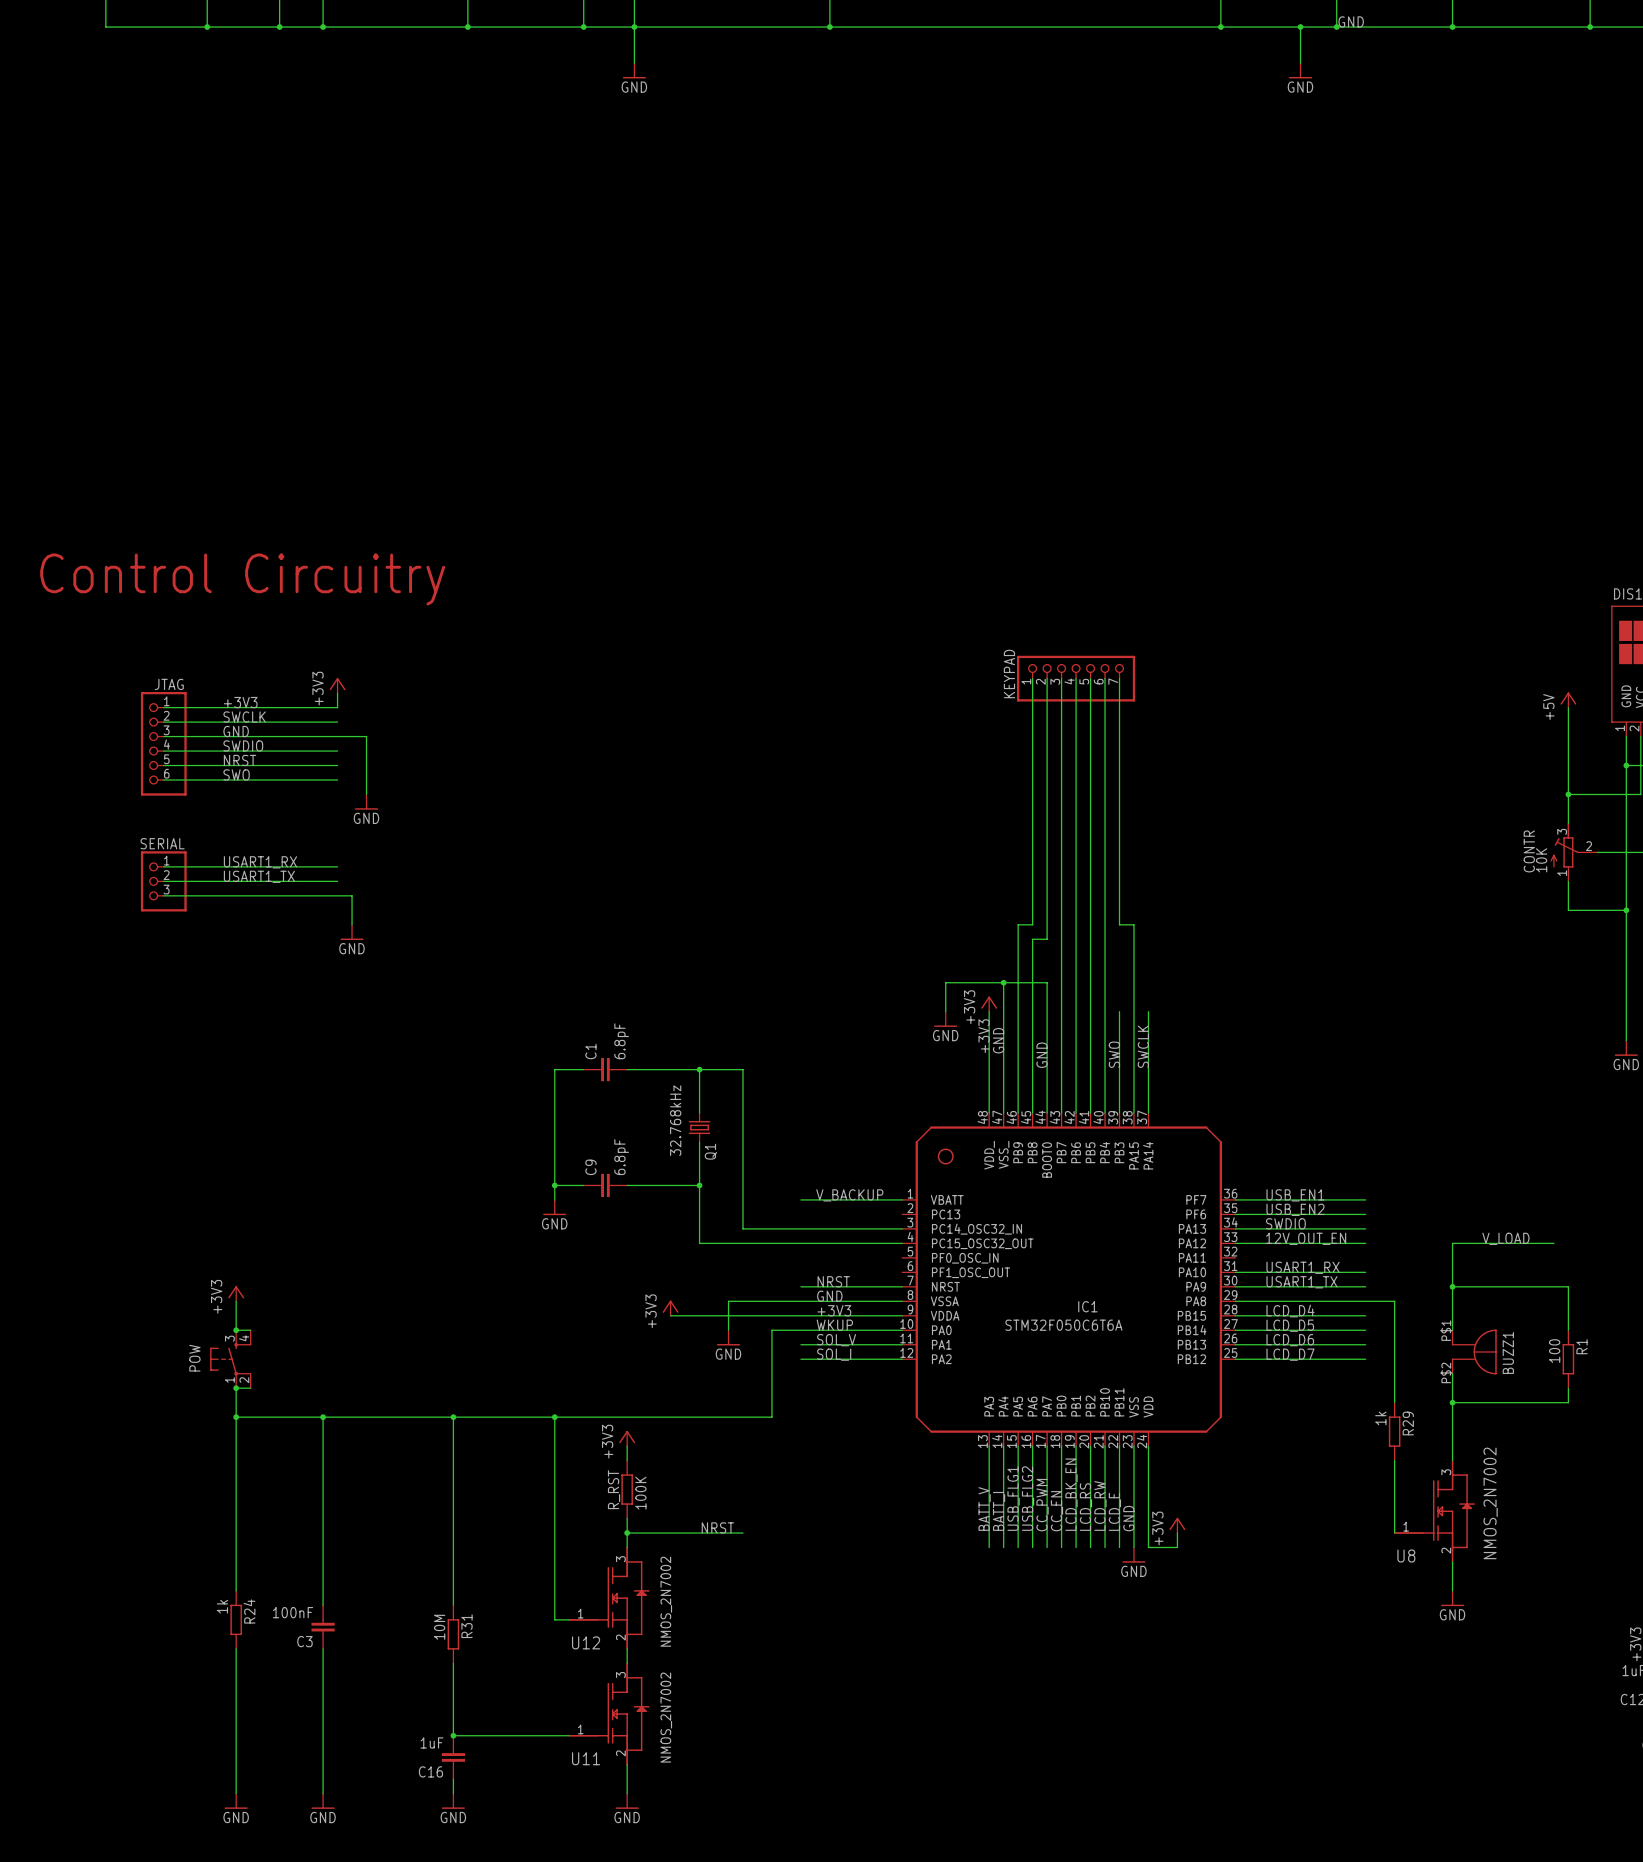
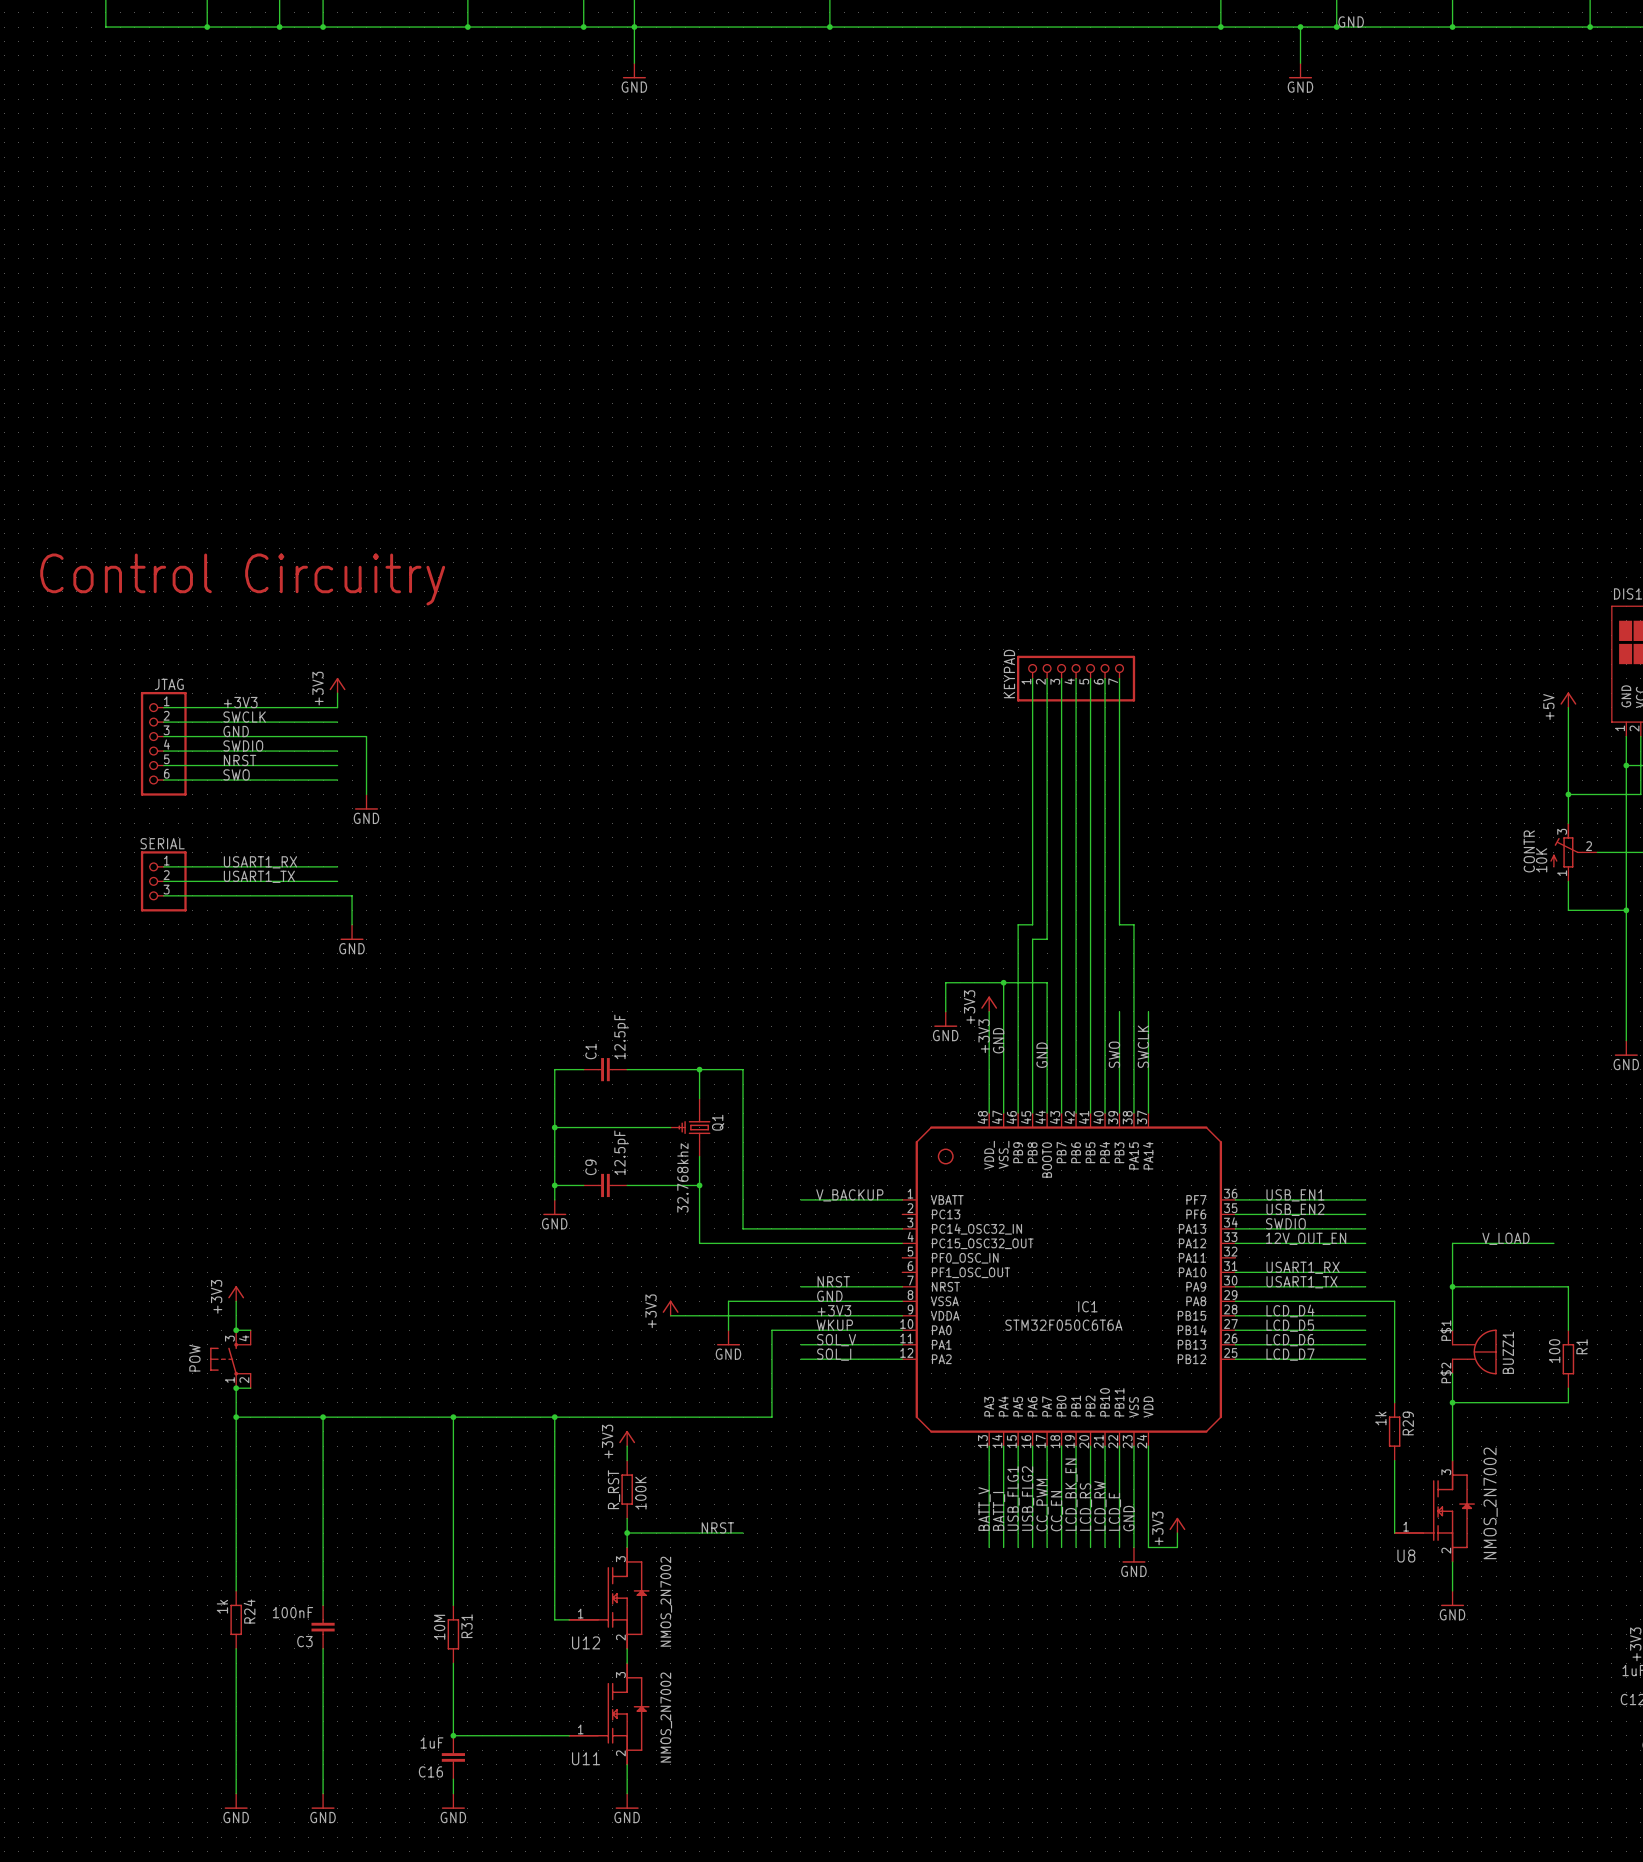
C1 value: 6.8pF (621, 1041) -> 12.5pF (621, 1036)
Q1 symbol: [688, 1112, 711, 1143] -> [670, 1098, 711, 1157]
Q1 value: 32.768kHz (675, 1120) -> 32.768khz (682, 1177)
wire: none -> (554, 1127) (670, 1127)
junction: none -> (554, 1127)
Q1 name position: Q1 (710, 1151) -> Q1 (718, 1122)
C9 value: 6.8pF (621, 1157) -> 12.5pF (621, 1152)

